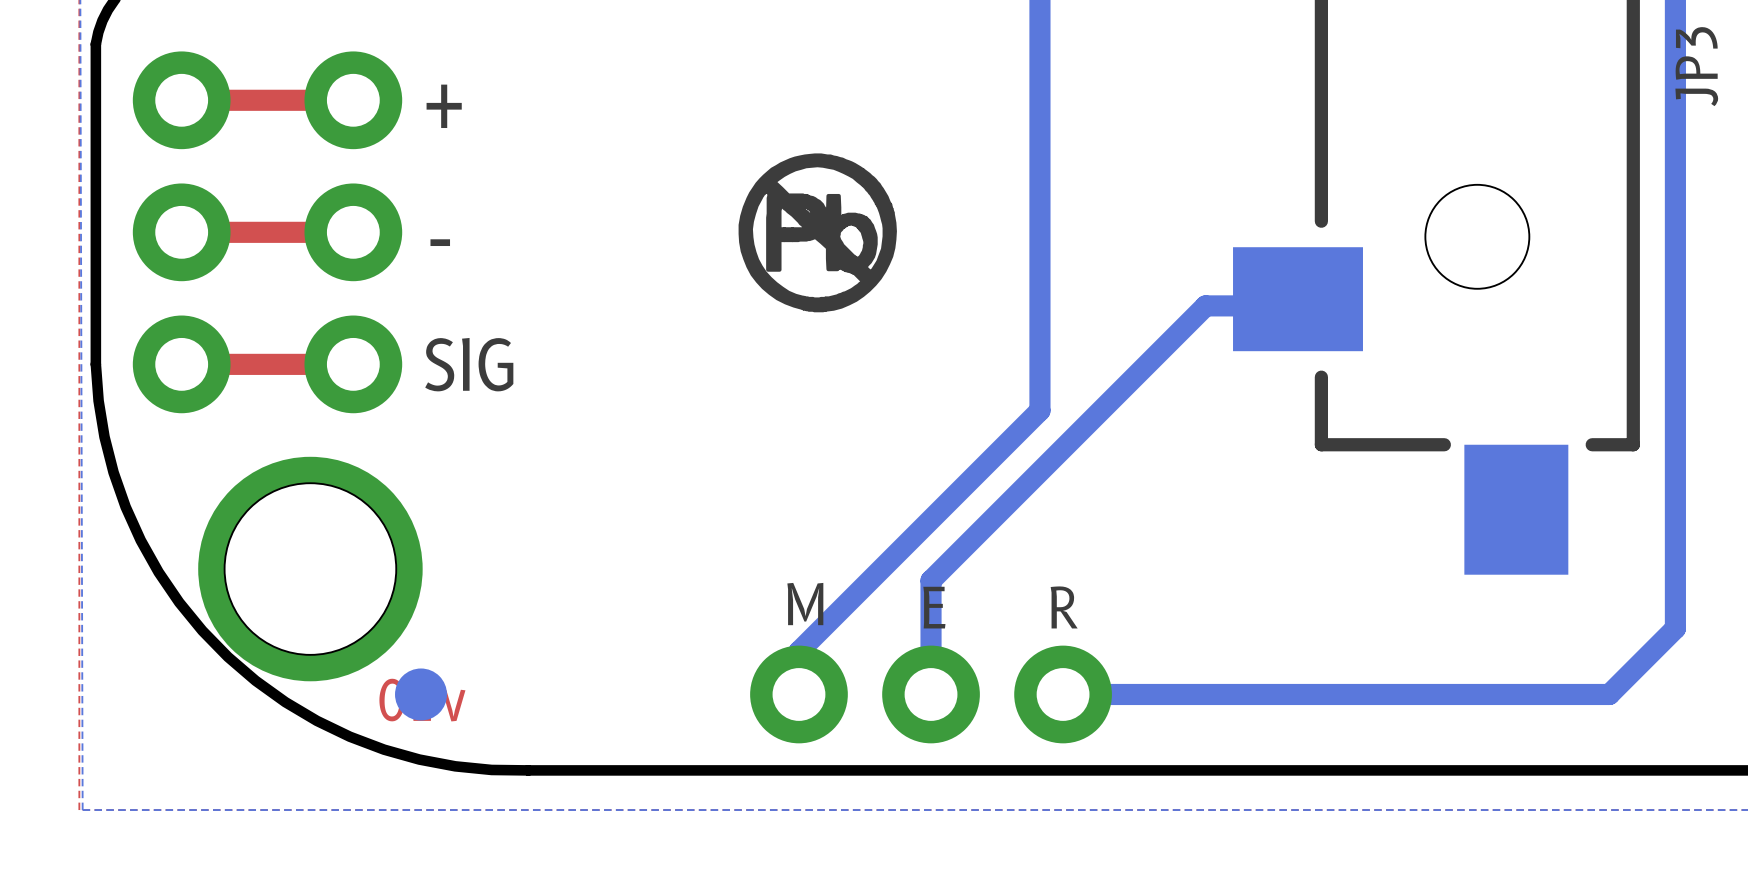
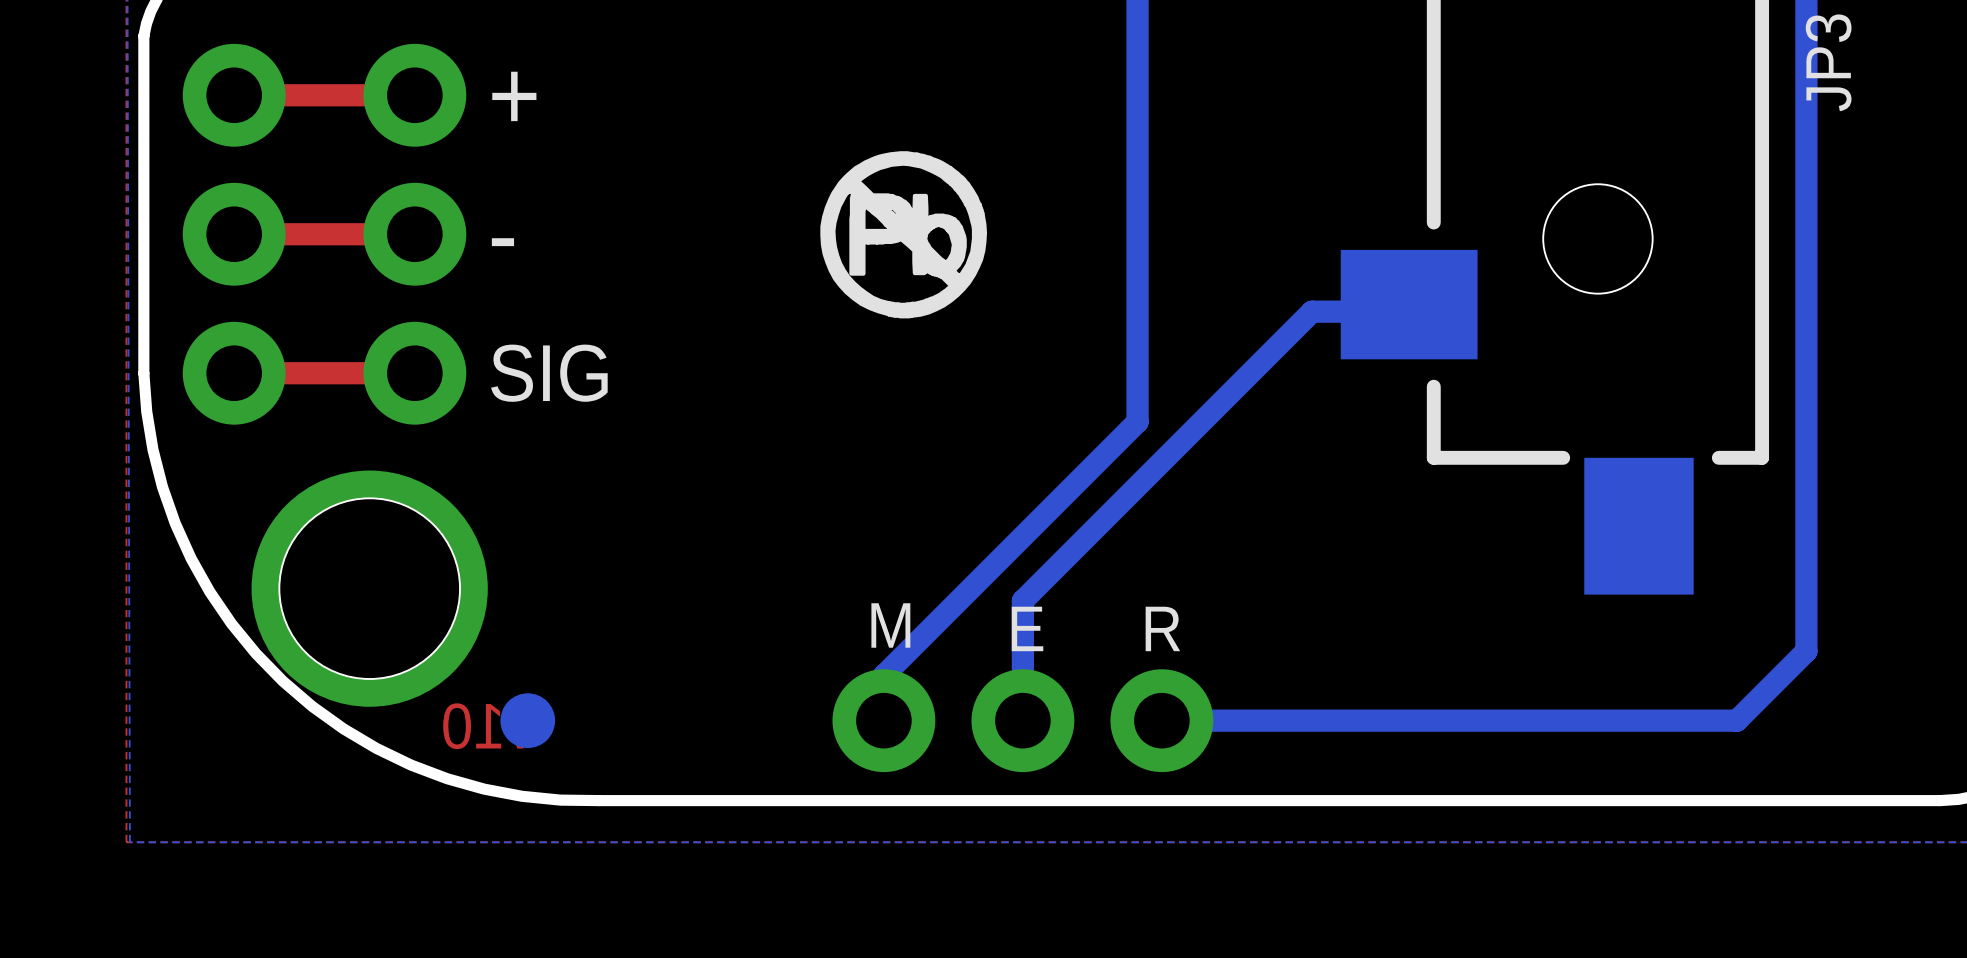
part position: (421, 694) -> (527, 720)

